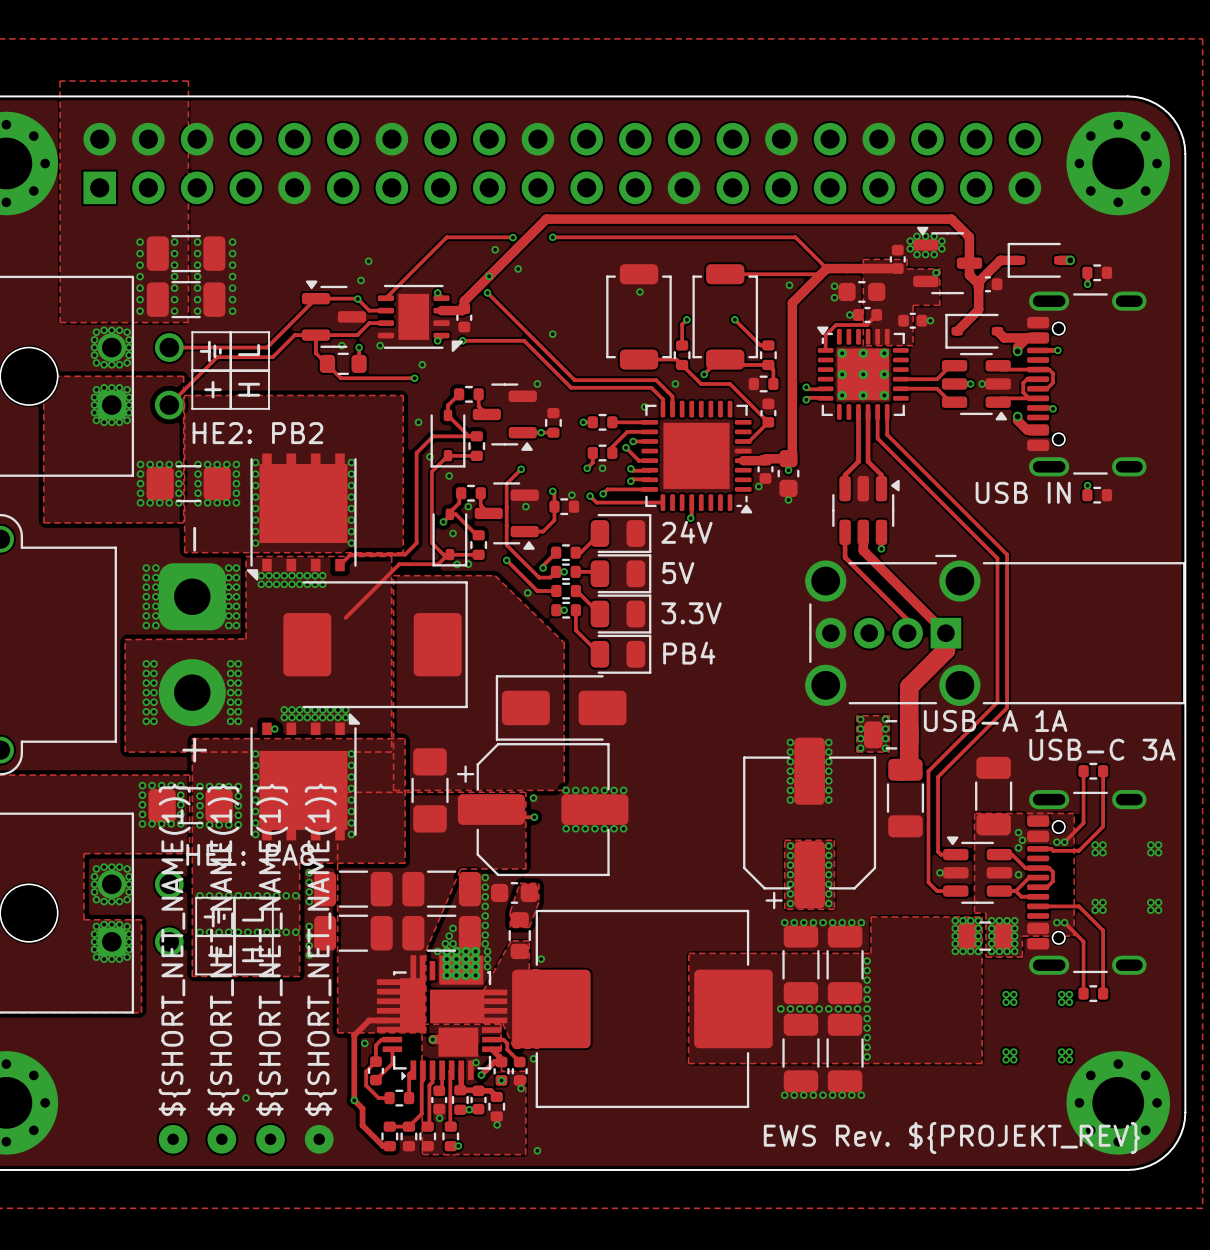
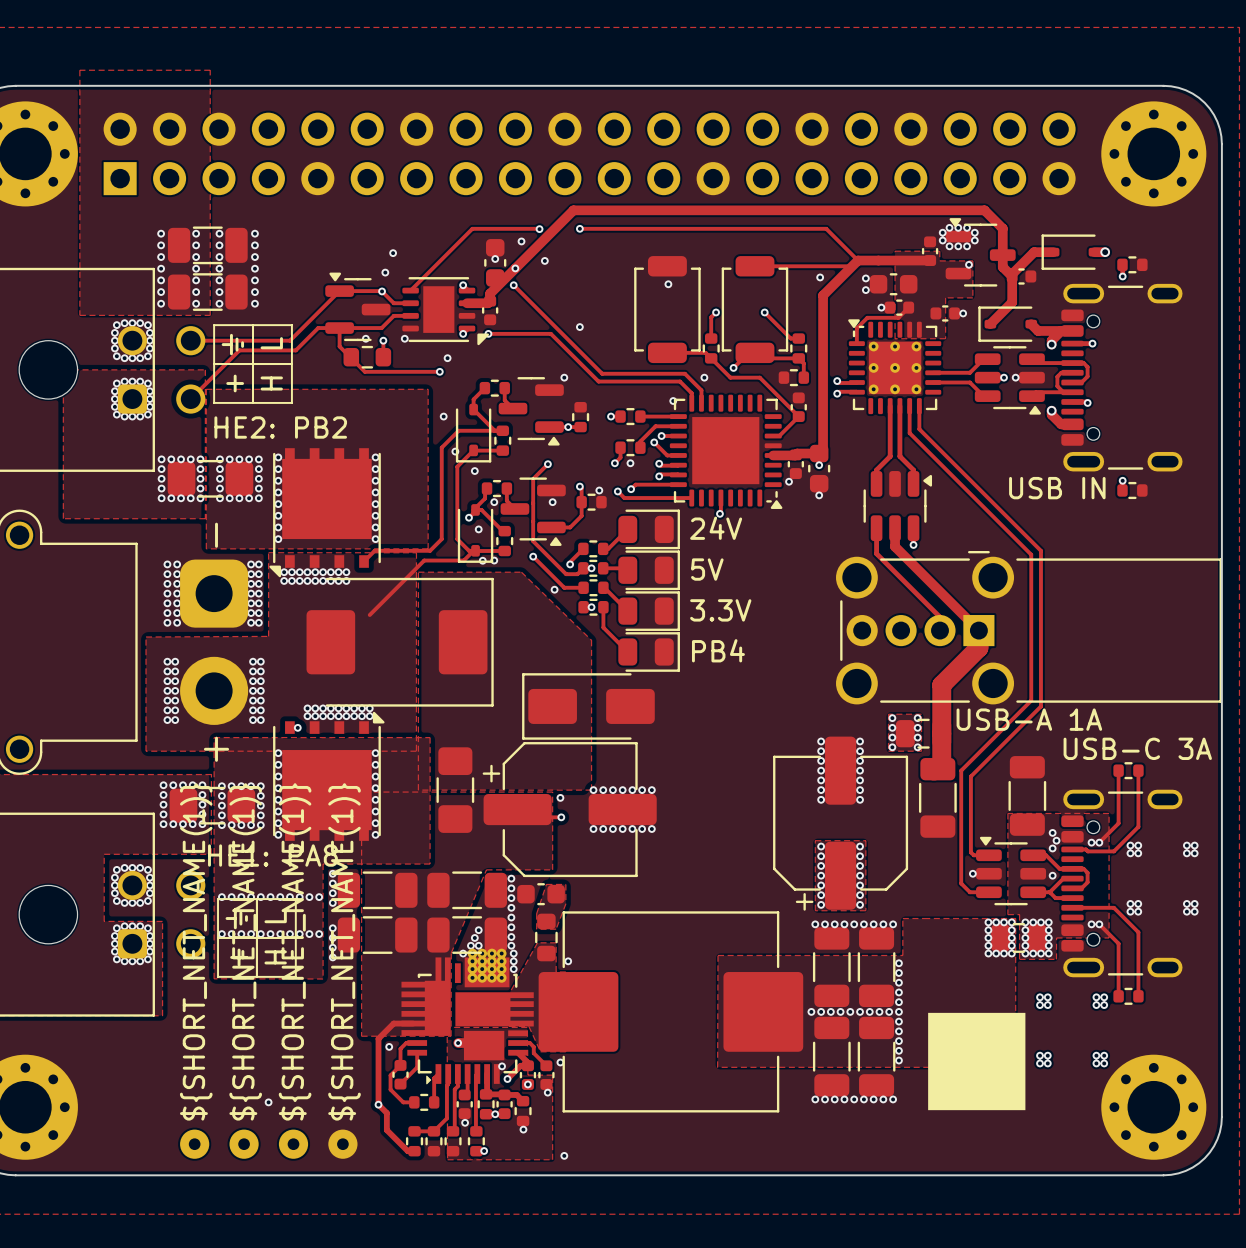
via: none -> (495, 258)
part: none -> (495, 262)
drawing: none -> [928, 1012, 1026, 1111]
text: EWS Rev. ${PROJEKT_REV} (951, 1137) -> none

